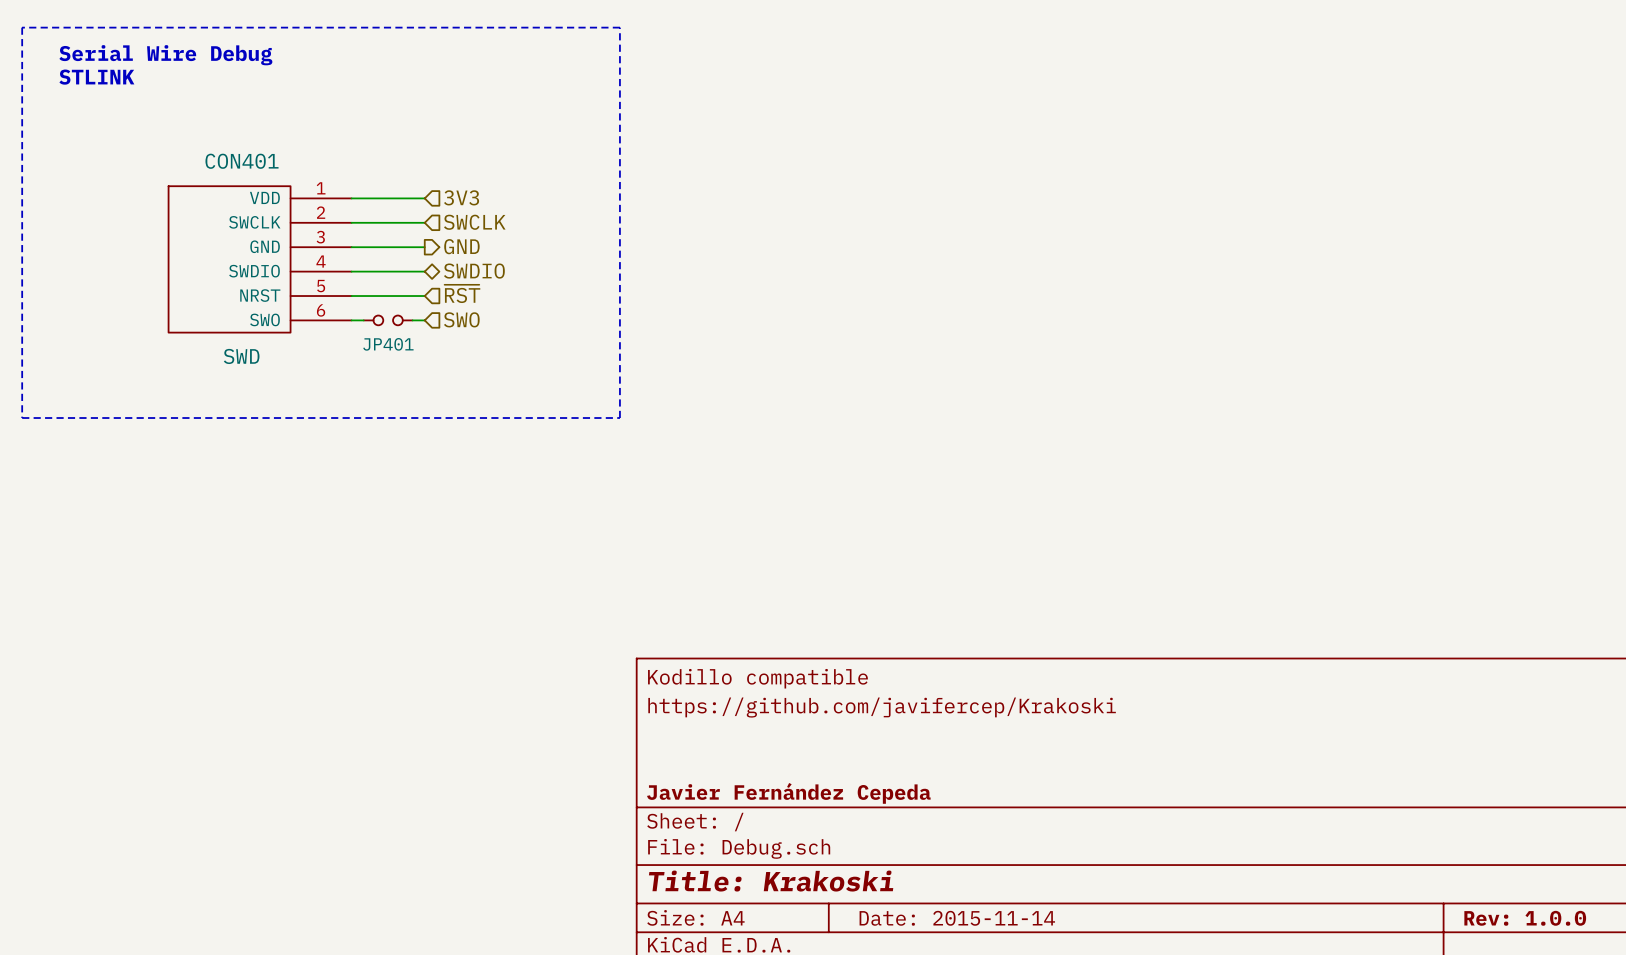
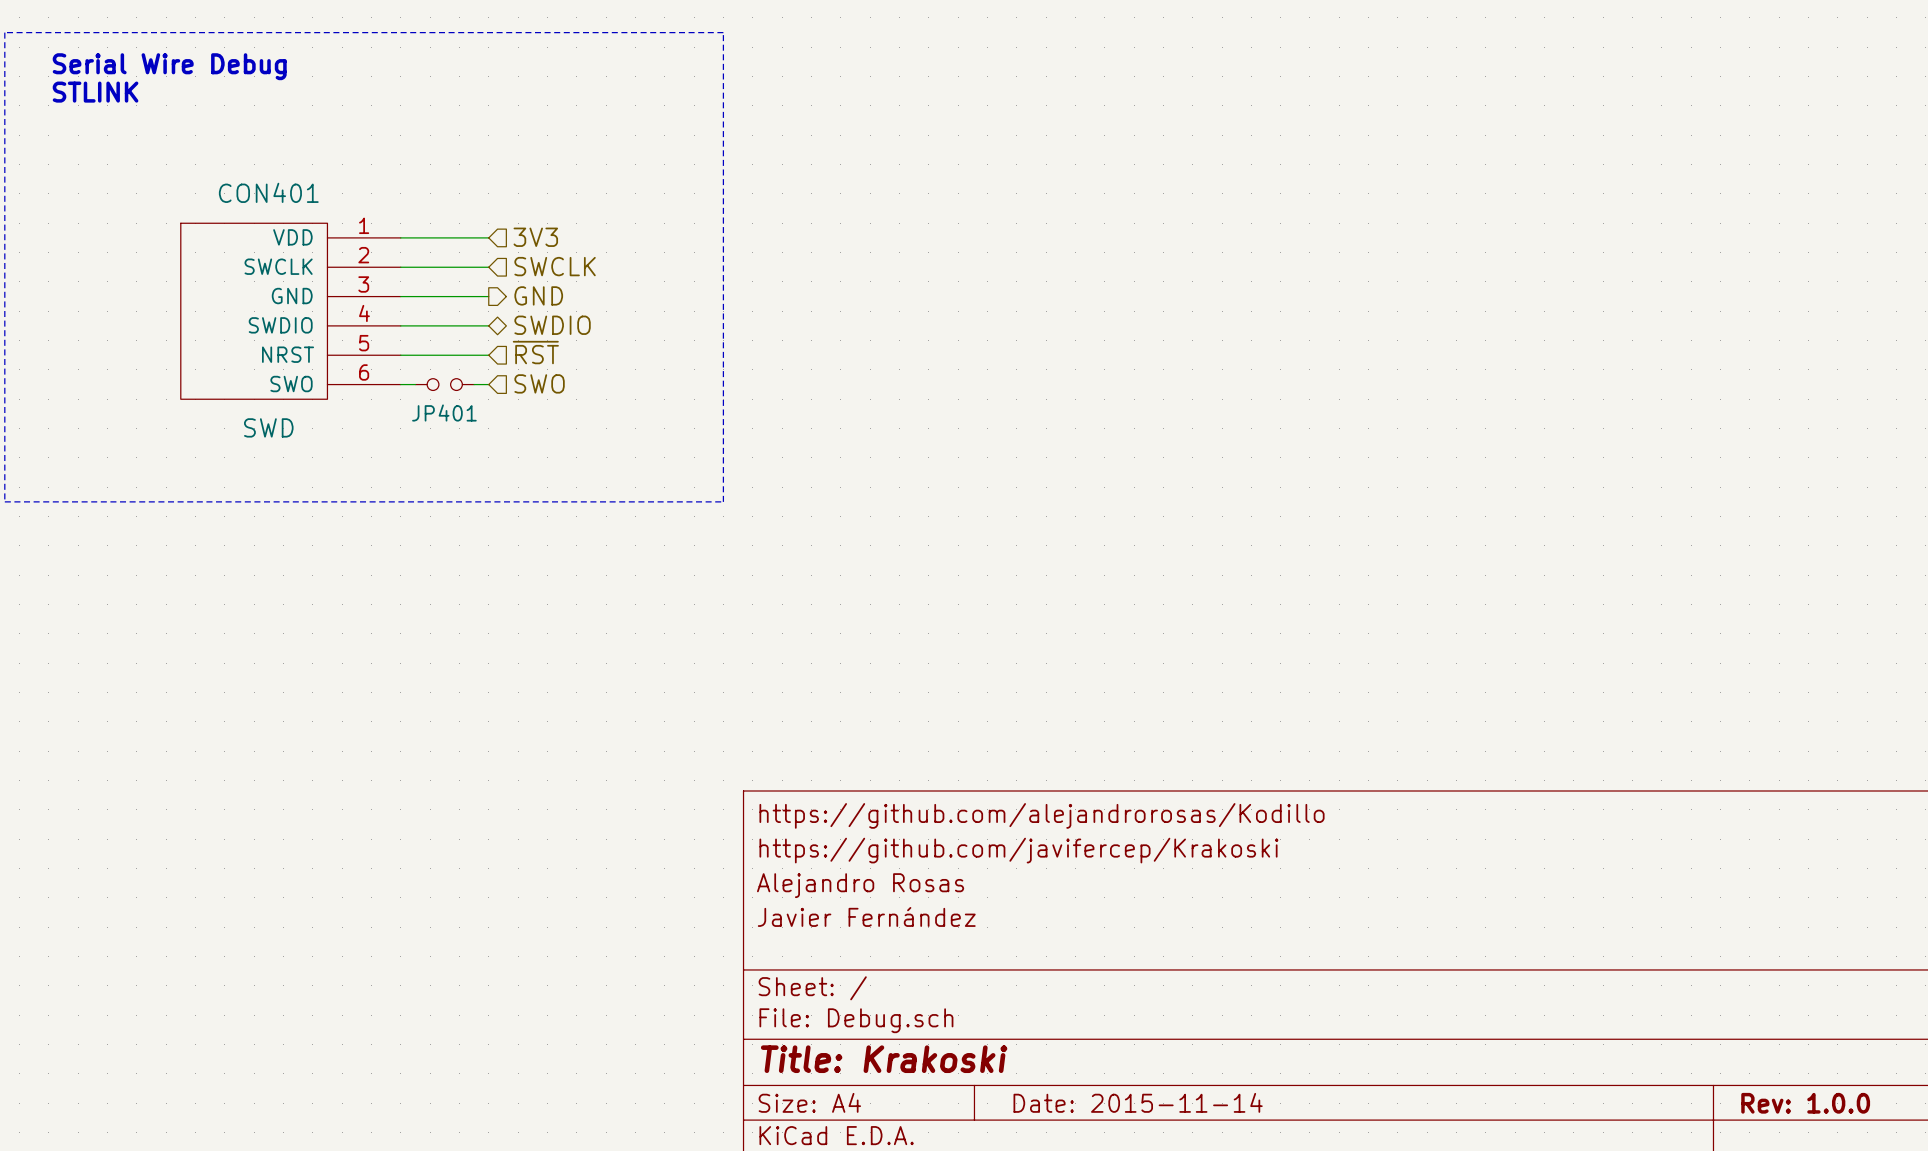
title block: Kodillo compatible (757, 678) -> https://github.com/alejandrorosas/Kodillo (1042, 815)
title block: none -> Alejandro Rosas (860, 885)
title block: Javier Fernández Cepeda (788, 793) -> Javier Fernández (866, 916)

